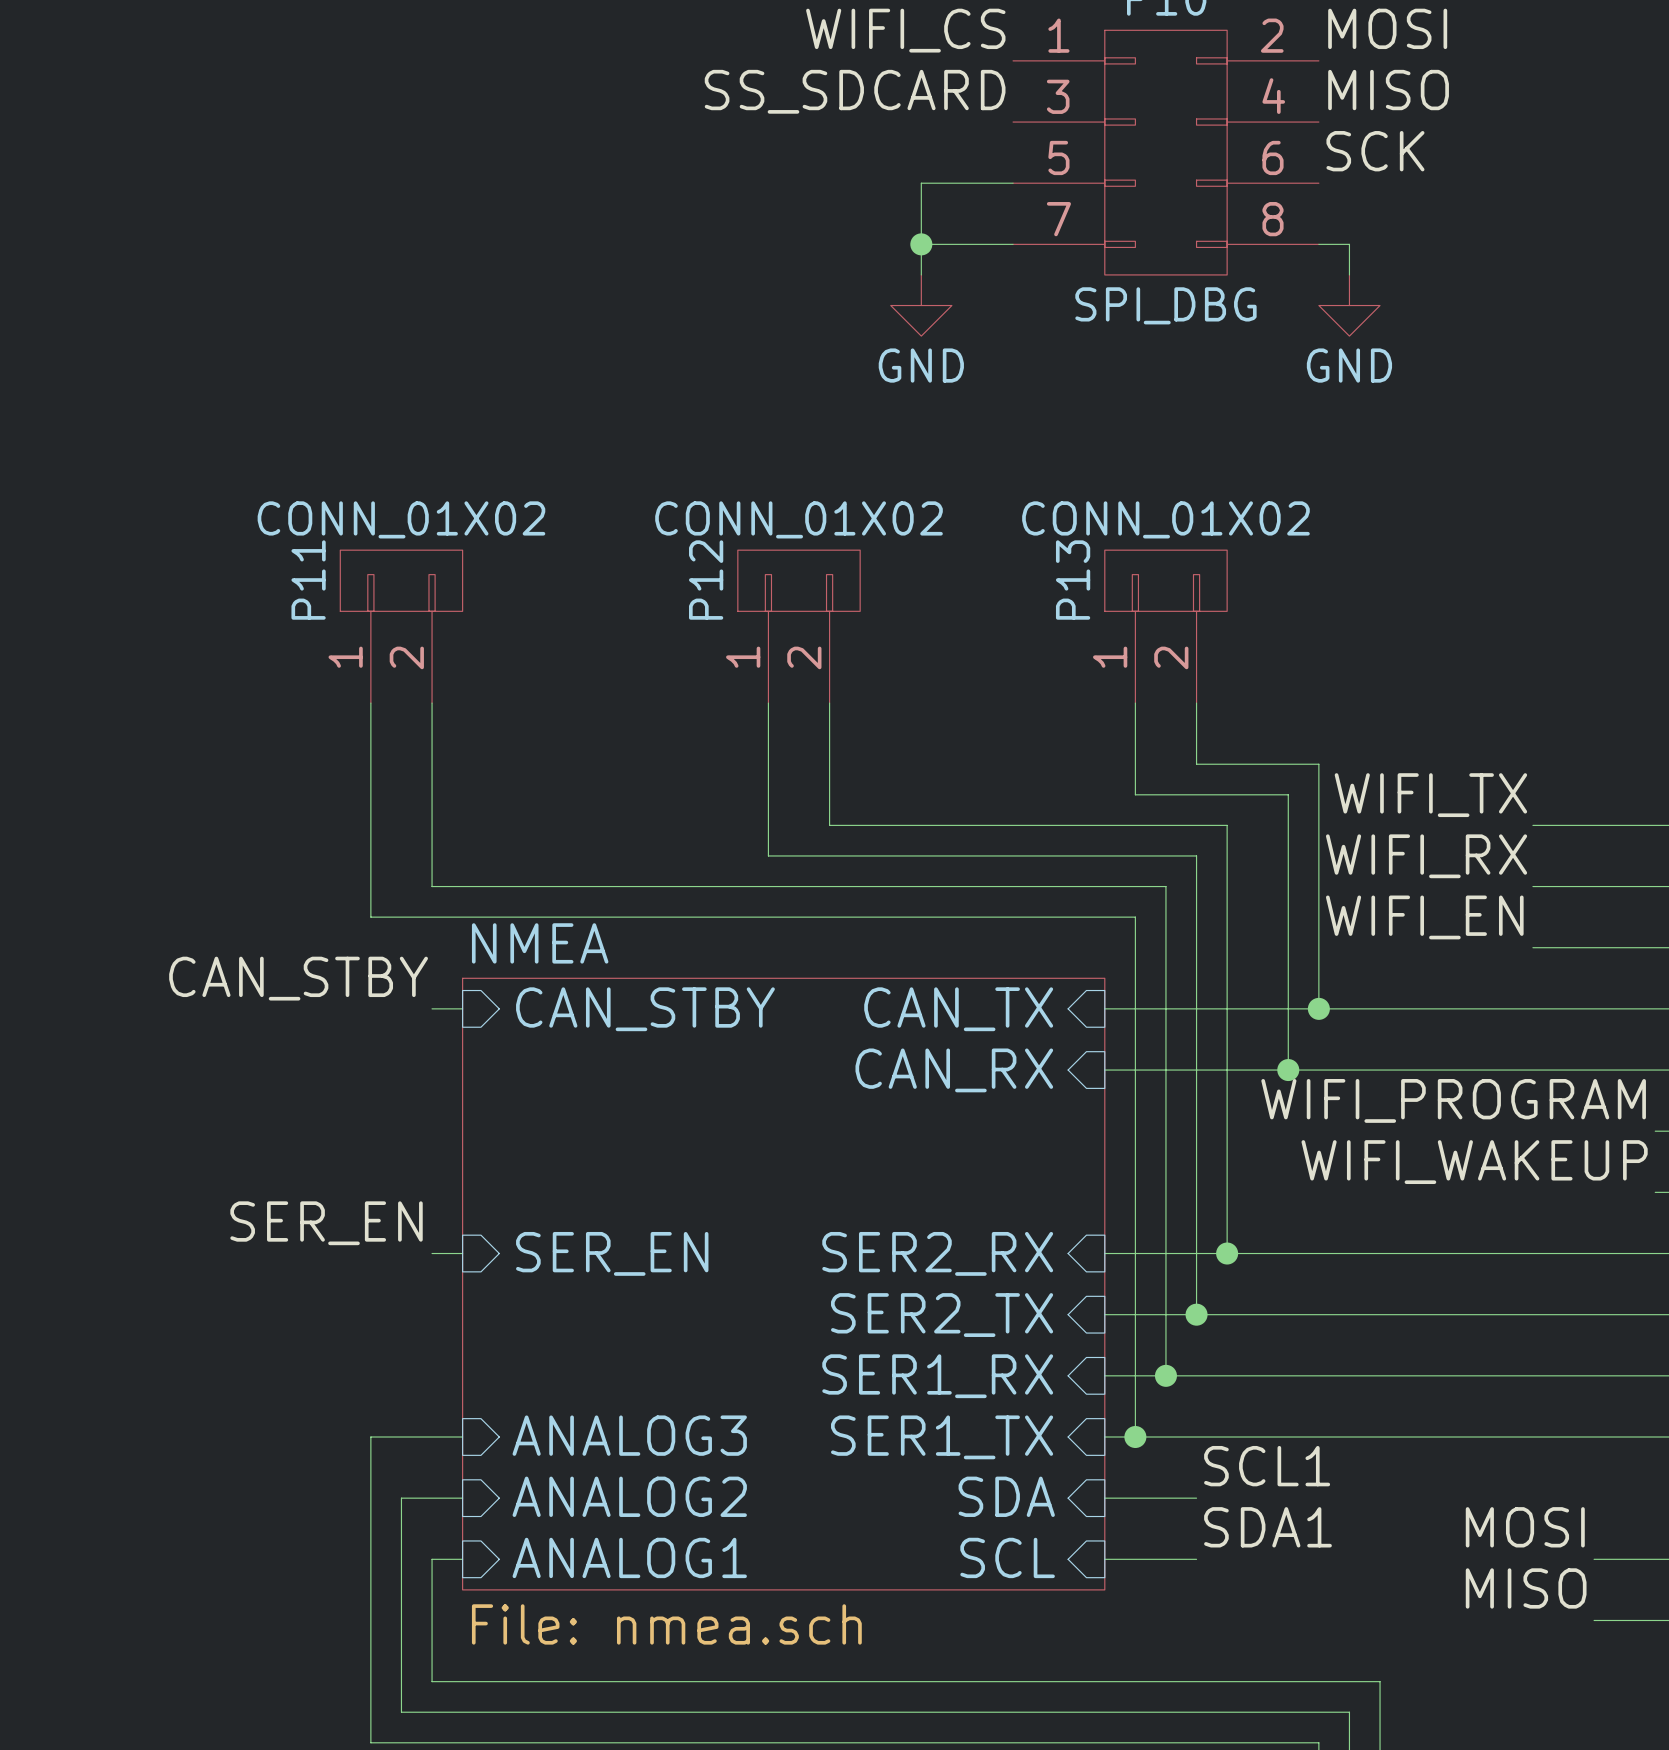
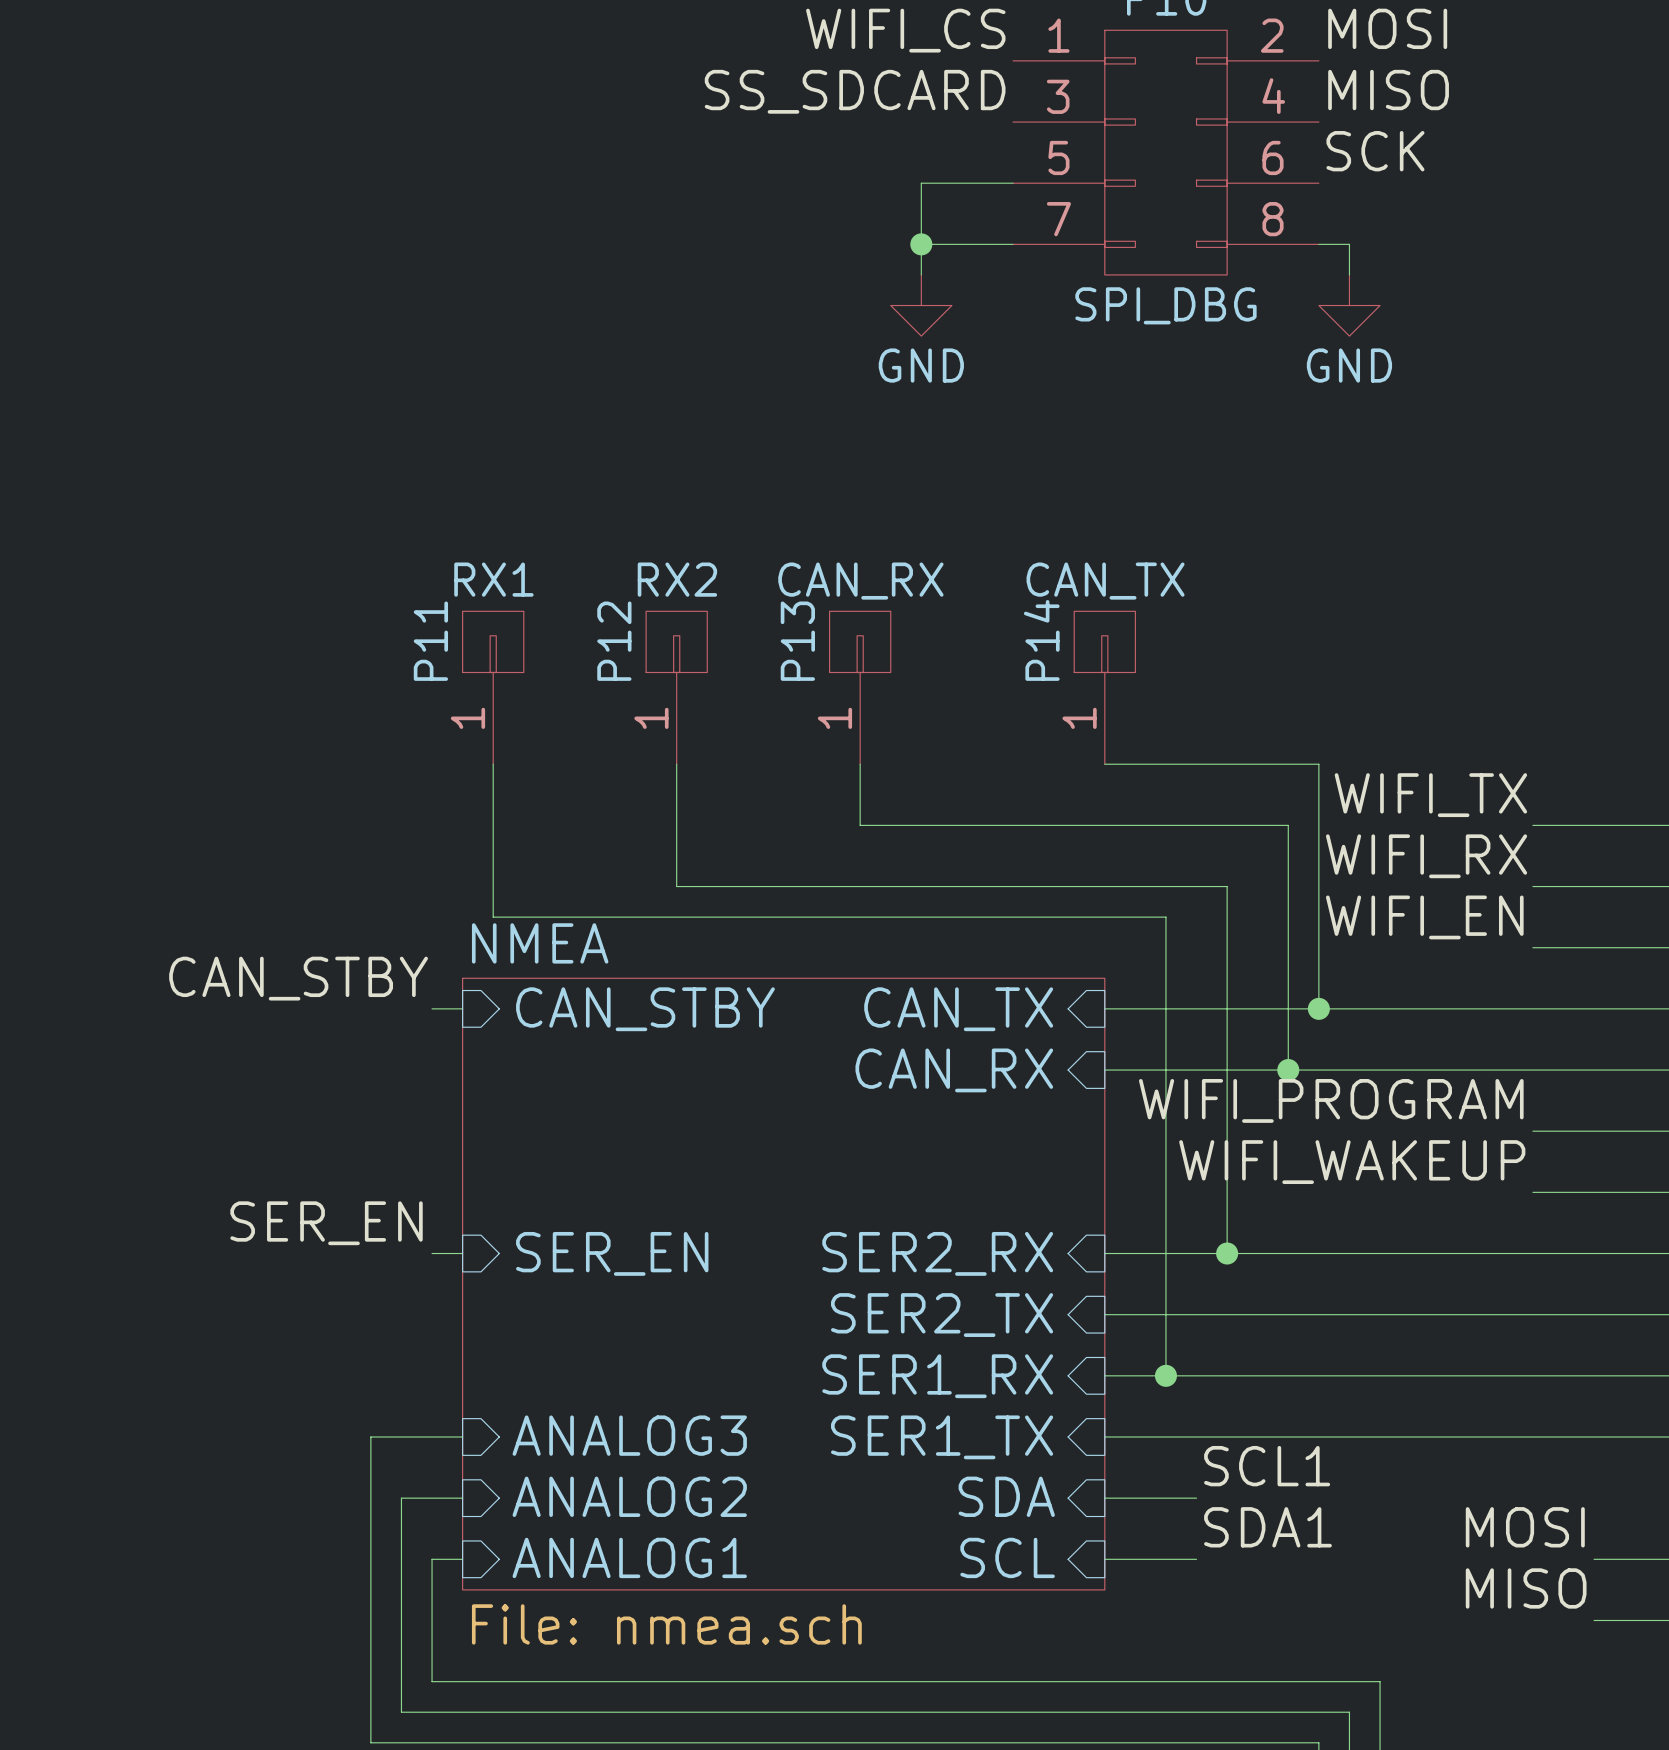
P11 value: CONN_01X02 (401, 519) -> RX1 (493, 579)
P12 value: CONN_01X02 (799, 519) -> RX2 (677, 579)
P13 value: CONN_01X02 (1165, 519) -> CAN_RX (860, 581)
P11 symbol: [340, 550, 463, 704] -> [462, 611, 524, 765]
P12 symbol: [737, 550, 861, 704] -> [646, 611, 708, 765]
P13 symbol: [1104, 550, 1228, 704] -> [829, 611, 891, 765]
P14: none -> CAN_TX (1104, 687)
wire: (370, 703) (370, 917) (493, 917) -> (493, 764) (493, 917)
wire: (432, 703) (432, 886) (676, 886) -> (676, 764) (676, 886)
wire: (768, 703) (768, 855) (1196, 855) (1196, 1314) -> none
wire: (829, 703) (829, 825) (860, 825) -> (860, 764) (860, 825)
wire: (1135, 703) (1135, 794) (1288, 794) (1288, 825) -> none
wire: (1196, 703) (1196, 764) -> (1104, 764) (1196, 764)
wire: (1227, 825) (1227, 886) -> (1227, 825) (1288, 825)
wire: (1165, 886) (1165, 917) -> (1135, 917) (1165, 917)
wire: none -> (1165, 886) (1227, 886)
wire: (1135, 917) (1135, 1437) -> none
label position: WIFI_PROGRAM (1453, 1100) -> WIFI_PROGRAM (1331, 1100)
wire: none -> (1532, 1131) (1655, 1131)
label position: WIFI_WAKEUP (1474, 1162) -> WIFI_WAKEUP (1352, 1162)
wire: none -> (1532, 1192) (1655, 1192)
junction: (1196, 1314) -> none
junction: (1135, 1437) -> none

